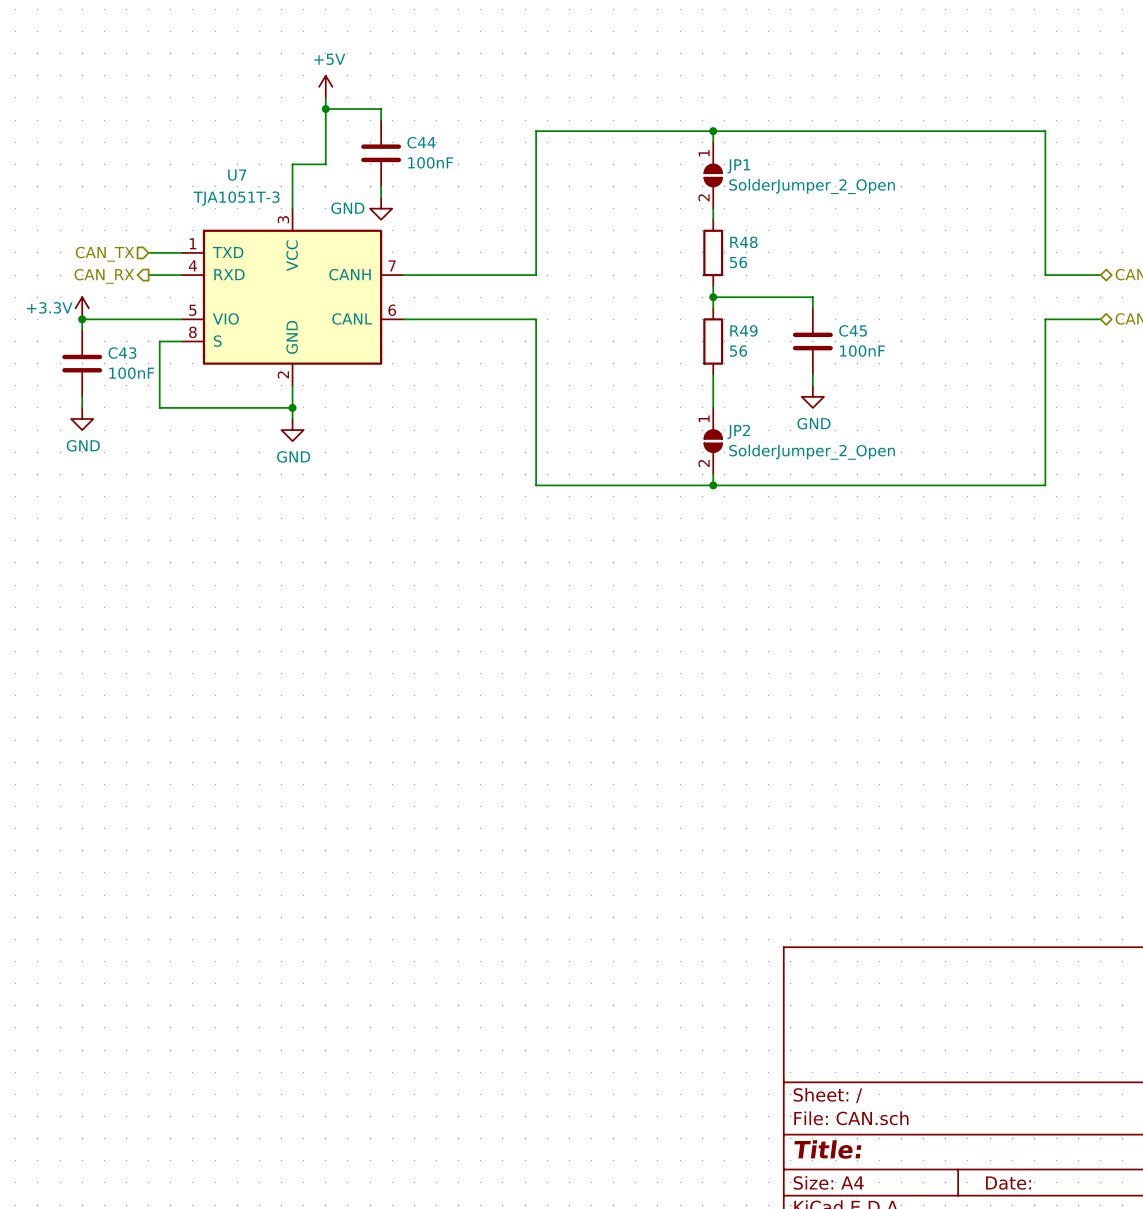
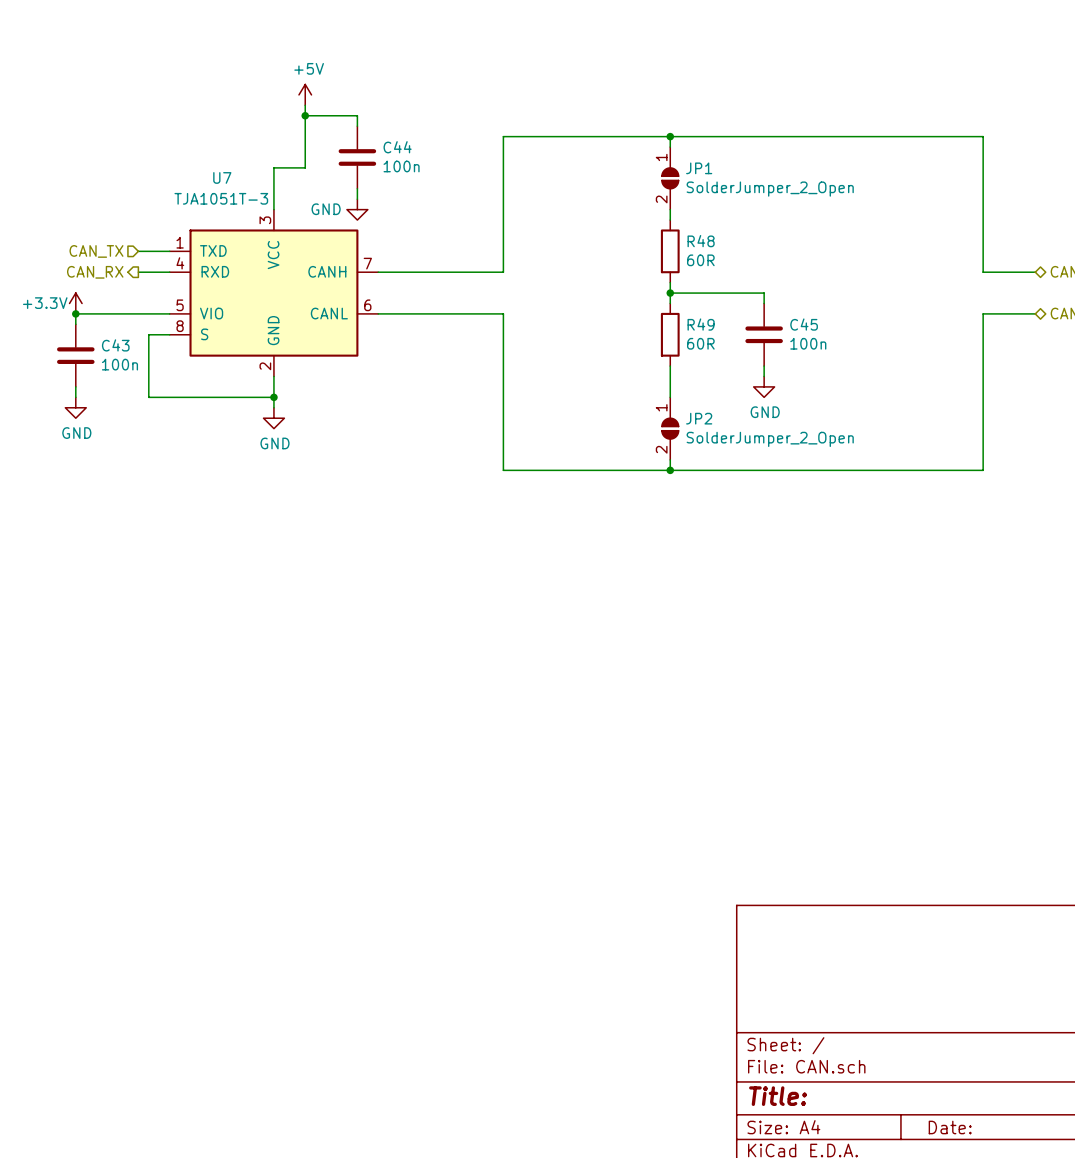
C44 value: 100nF (430, 162) -> 100n (401, 166)
R48 value: 56 (738, 262) -> 60R (700, 260)
R49 value: 56 (738, 351) -> 60R (700, 343)
C45 value: 100nF (862, 351) -> 100n (808, 343)
C43 value: 100nF (131, 373) -> 100n (119, 364)

